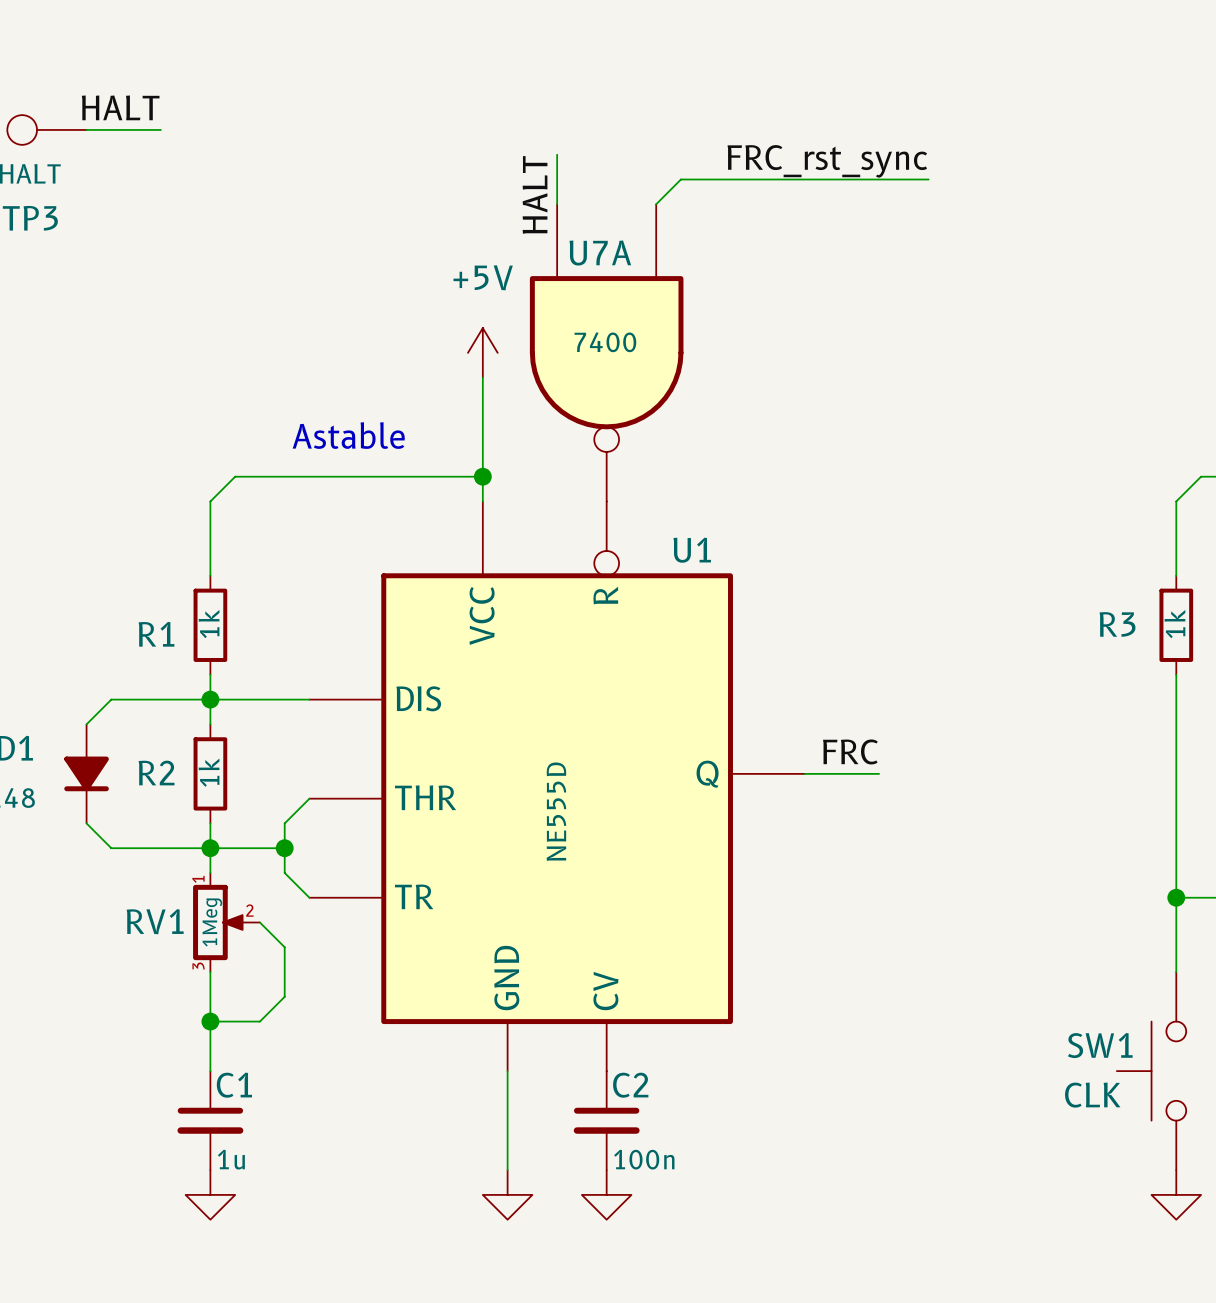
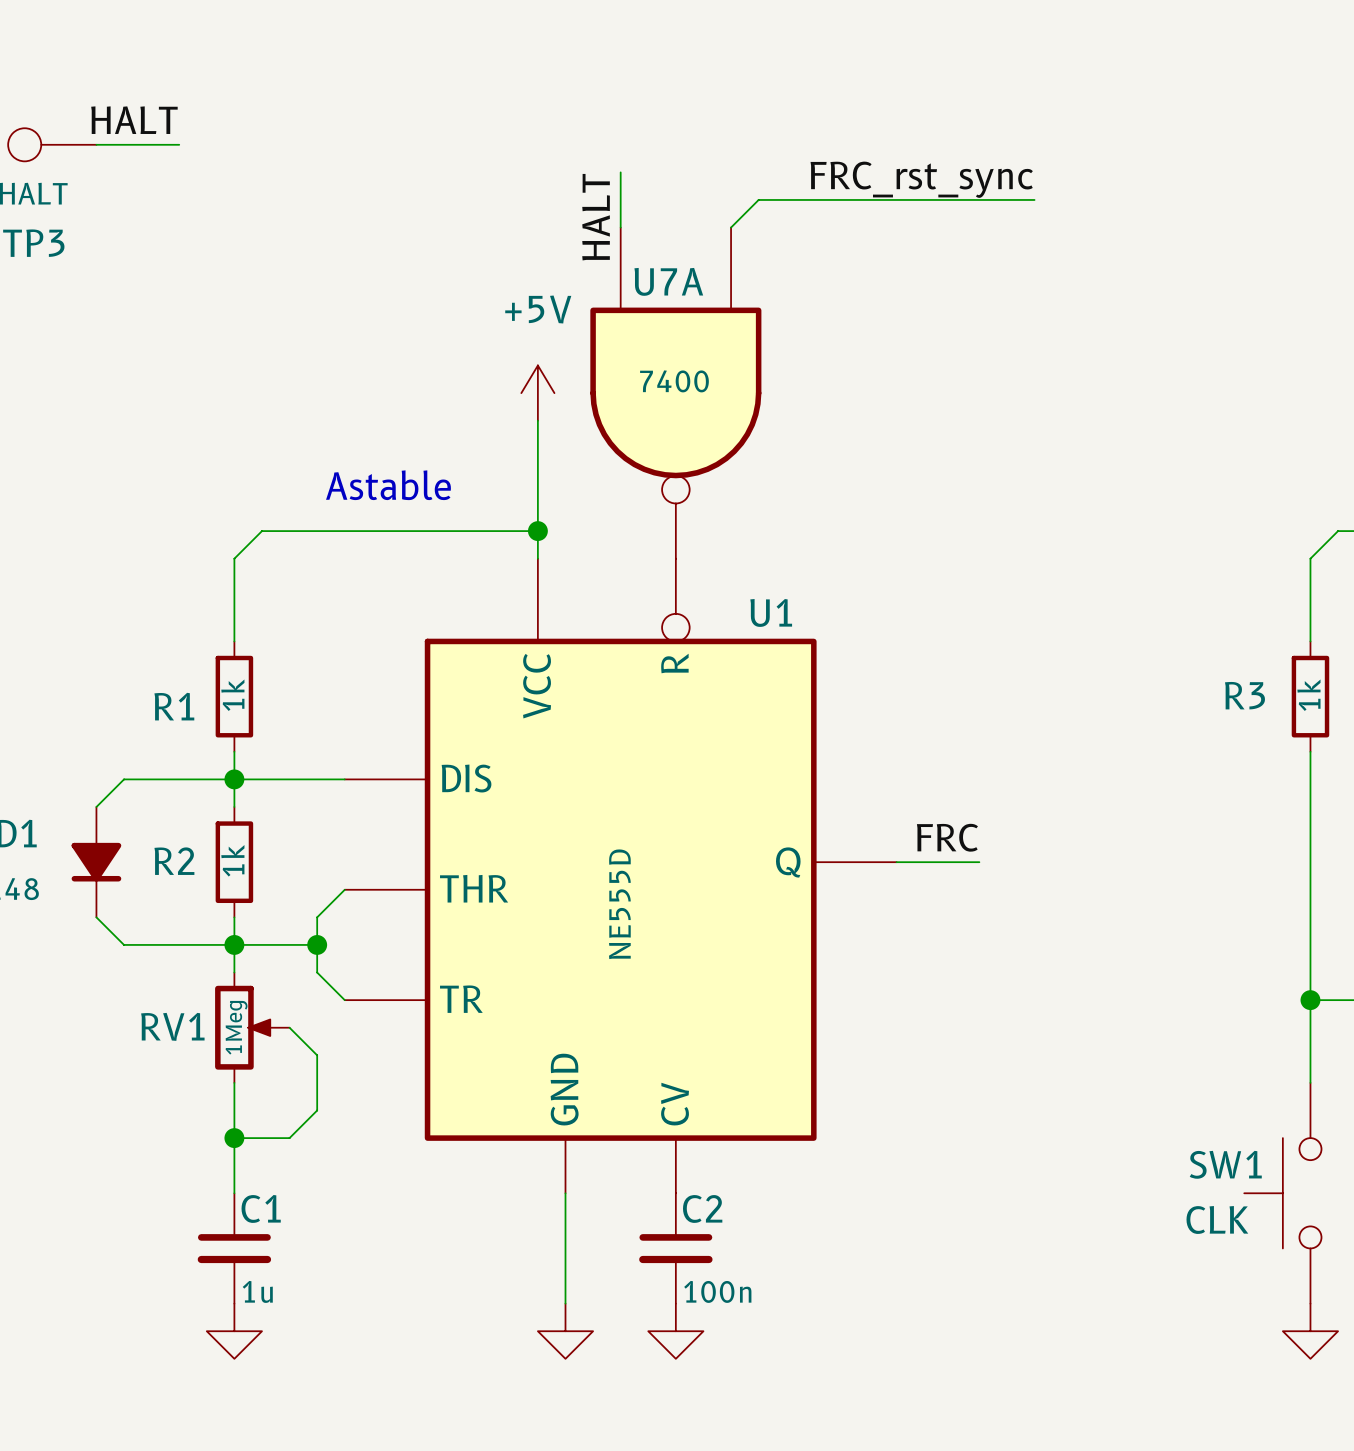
RV1 pin number: 1 (198, 879) -> none
RV1 pin number: 2 (249, 910) -> none
RV1 pin number: 3 (198, 966) -> none

